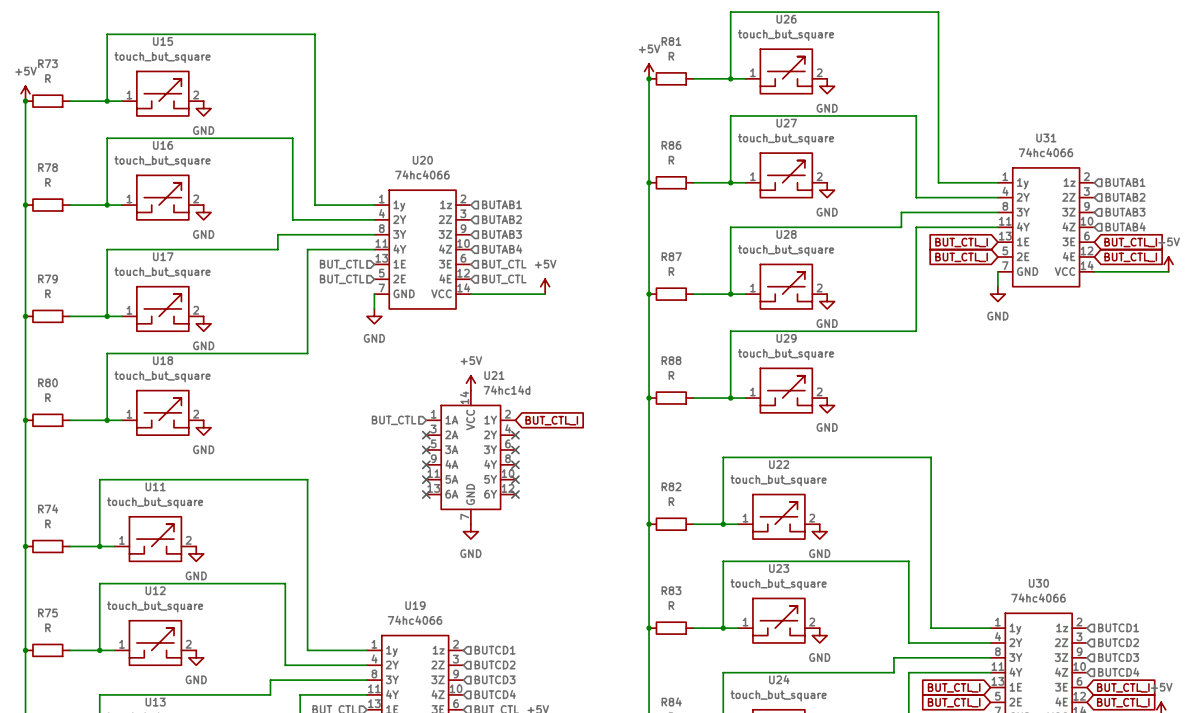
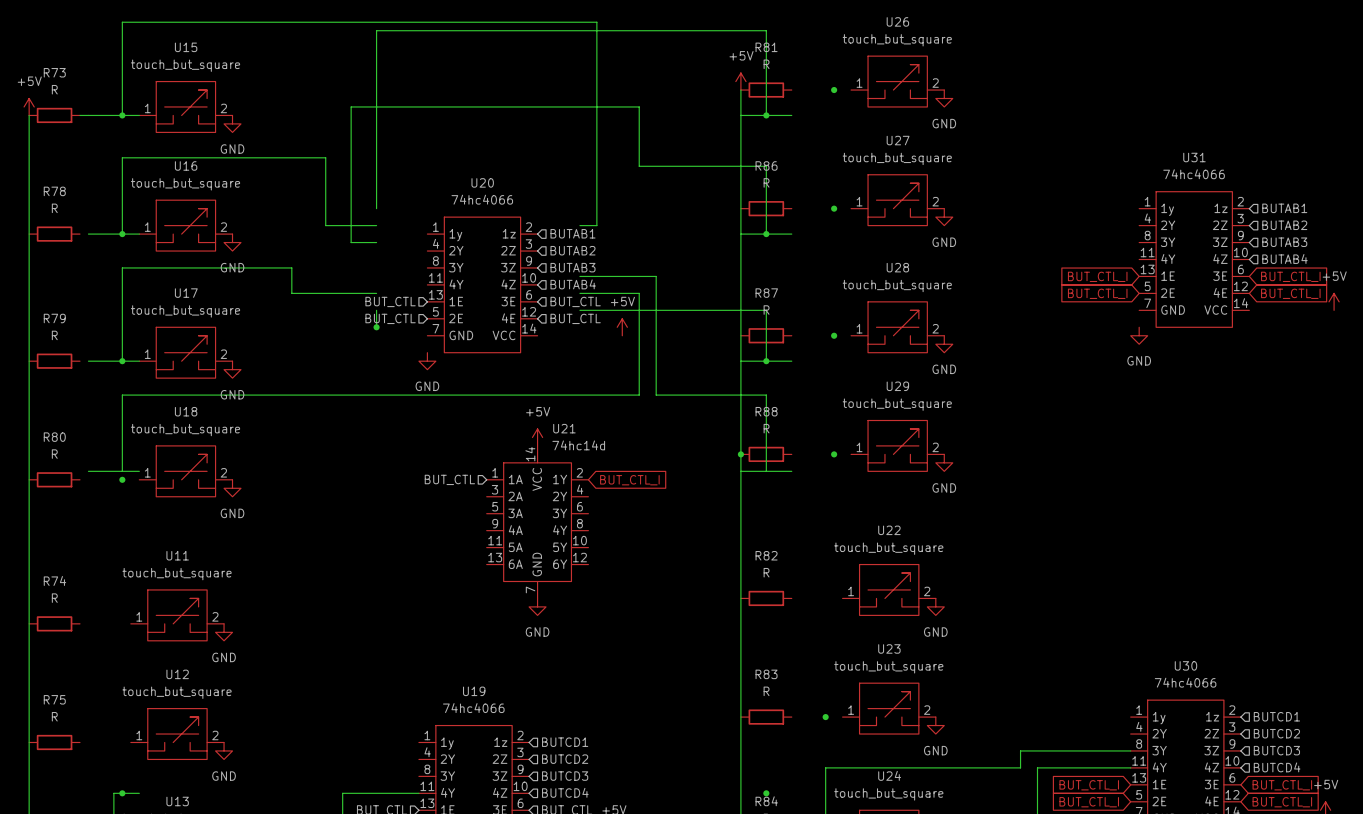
wire: (107, 34) (315, 34) (315, 205) (374, 205) -> (122, 39) (122, 22) (596, 22) (596, 225) (579, 225)
junction position: (649, 78) -> (766, 115)
wire: (693, 78) (745, 78) -> none
wire: (730, 78) (730, 12) (938, 12) (938, 182) (997, 182) -> none
junction: (25, 101) -> none
wire: none -> (740, 115) (791, 115)
wire: none -> (766, 115) (766, 30) (376, 30) (376, 208)
wire: (285, 138) (292, 138) (292, 219) (374, 219) -> (325, 157) (325, 225) (376, 225)
junction position: (649, 182) -> (766, 234)
wire: (693, 182) (745, 182) -> none
wire: (730, 182) (730, 115) (916, 115) (916, 197) (997, 197) -> none
junction: (25, 205) -> none
wire: (70, 205) (77, 205) -> none
wire: none -> (740, 234) (791, 234)
wire: none -> (766, 234) (766, 166) (639, 166) (639, 106) (351, 106) (351, 242) (376, 242)
wire: (997, 212) (901, 212) (901, 227) (730, 227) (730, 294) -> none
wire: (997, 227) (916, 227) (916, 331) (730, 331) (730, 398) -> none
wire: (374, 234) (277, 234) (277, 249) (107, 249) -> (376, 293) (291, 293) (291, 267) (122, 267) (122, 284)
wire: none -> (579, 276) (656, 276) (656, 395) (766, 395) (766, 471)
wire: (374, 249) (307, 249) (307, 353) (107, 353) -> (579, 293) (639, 293) (639, 395) (122, 395) (122, 403)
wire: none -> (579, 310) (766, 310) (766, 361)
wire: (997, 271) (997, 286) -> none
wire: (1094, 271) (1168, 271) -> none
junction: none -> (376, 327)
wire: (374, 294) (374, 308) -> (376, 310) (376, 327)
wire: (470, 294) (545, 294) -> none
junction position: (649, 294) -> (766, 361)
wire: (693, 294) (745, 294) -> none
junction: (25, 316) -> none
wire: (70, 316) (77, 316) -> none
wire: none -> (740, 361) (791, 361)
wire: (693, 398) (745, 398) -> none
junction: (25, 420) -> none
wire: (70, 420) (122, 420) -> none
no-connect mark: (426, 435) -> none
no-connect mark: (515, 435) -> none
no-connect mark: (426, 450) -> none
no-connect mark: (515, 450) -> none
no-connect mark: (426, 464) -> none
no-connect mark: (515, 464) -> none
no-connect mark: (426, 479) -> none
no-connect mark: (515, 479) -> none
no-connect mark: (426, 494) -> none
no-connect mark: (515, 494) -> none
junction: (649, 524) -> none
wire: (693, 524) (738, 524) -> (740, 471) (791, 471)
wire: (723, 524) (723, 457) (931, 457) (931, 628) (990, 628) -> none
junction: (723, 524) -> none
junction: (25, 546) -> none
wire: (70, 546) (114, 546) -> (88, 471) (139, 471)
wire: (99, 546) (99, 479) (307, 479) (307, 650) (366, 650) -> none
junction: (99, 546) -> none
junction: (649, 628) -> none
wire: (693, 628) (738, 628) -> none
wire: (723, 628) (723, 561) (908, 561) (908, 642) (990, 642) -> none
junction: (25, 650) -> none
wire: (70, 650) (114, 650) -> none
wire: (99, 650) (99, 583) (285, 583) (285, 665) (366, 665) -> none
junction: (99, 650) -> none
wire: (366, 680) (270, 680) (270, 694) (122, 694) -> none
junction: none -> (122, 793)
junction: none -> (766, 793)

